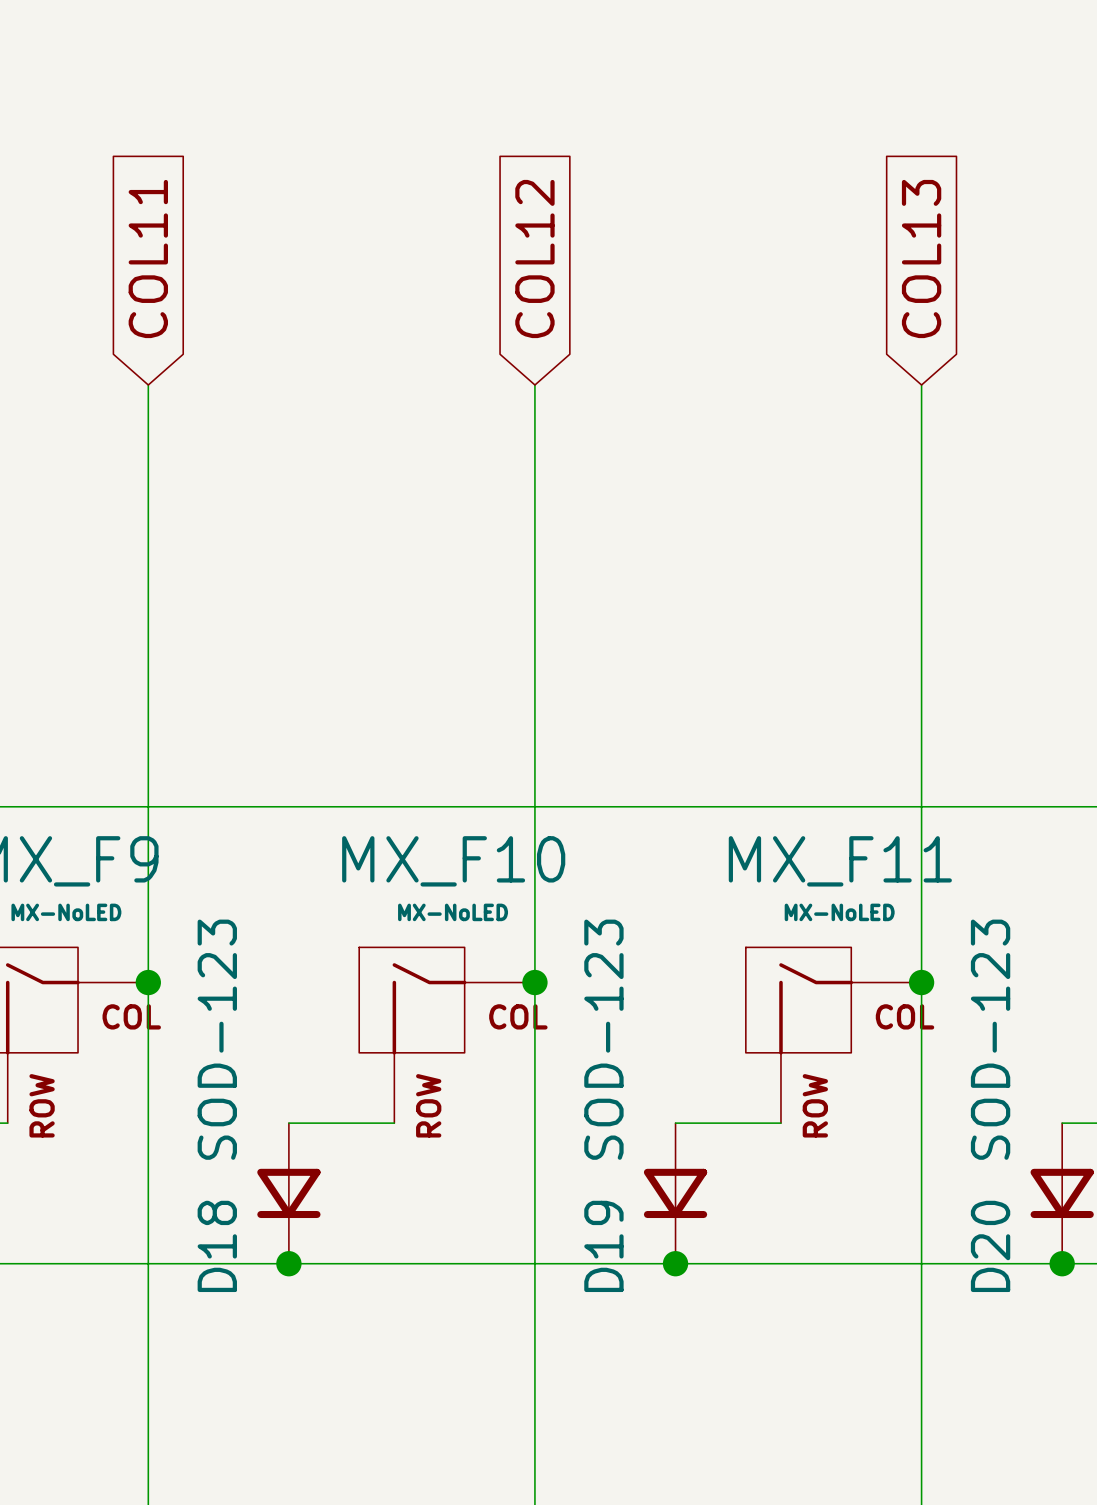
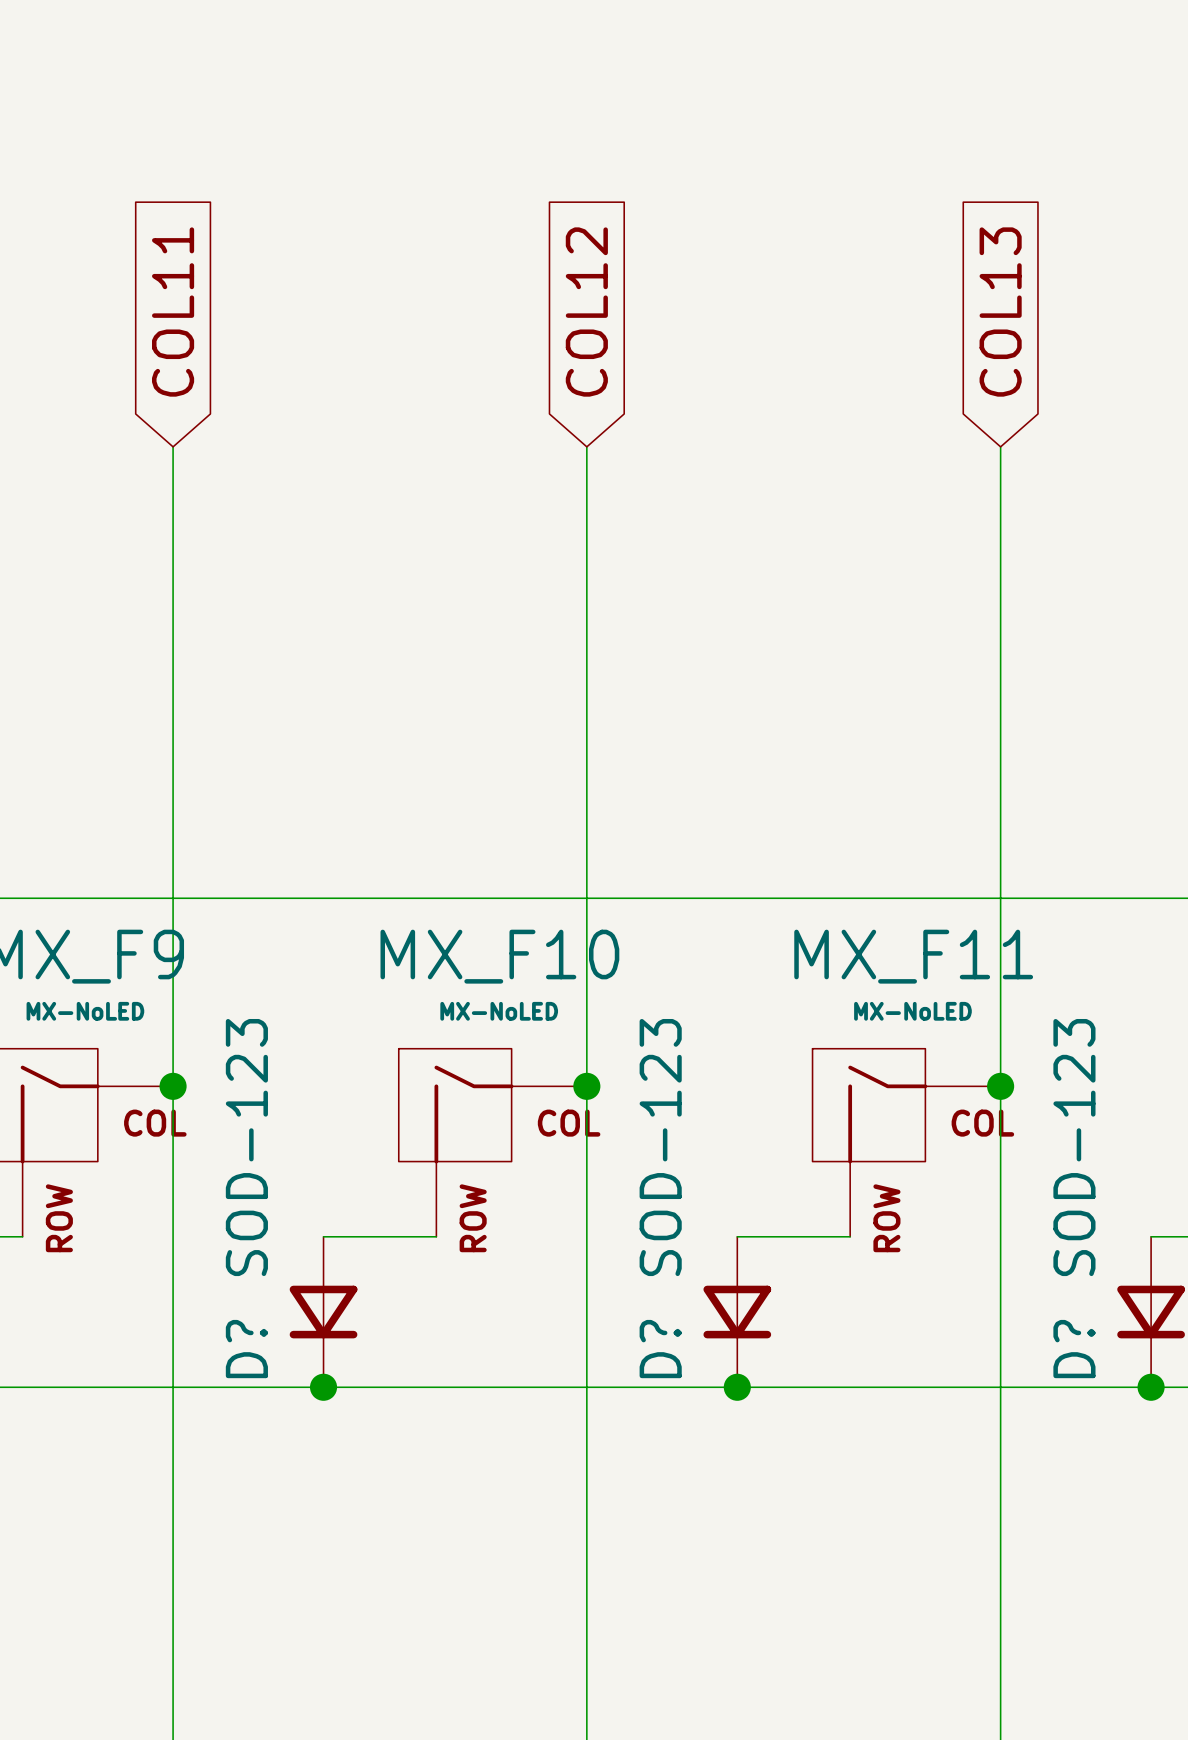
D18 name: D18 (217, 1246) -> D? (246, 1349)
D19 name: D19 (603, 1246) -> D? (660, 1349)
D20 name: D20 (990, 1246) -> D? (1074, 1349)

